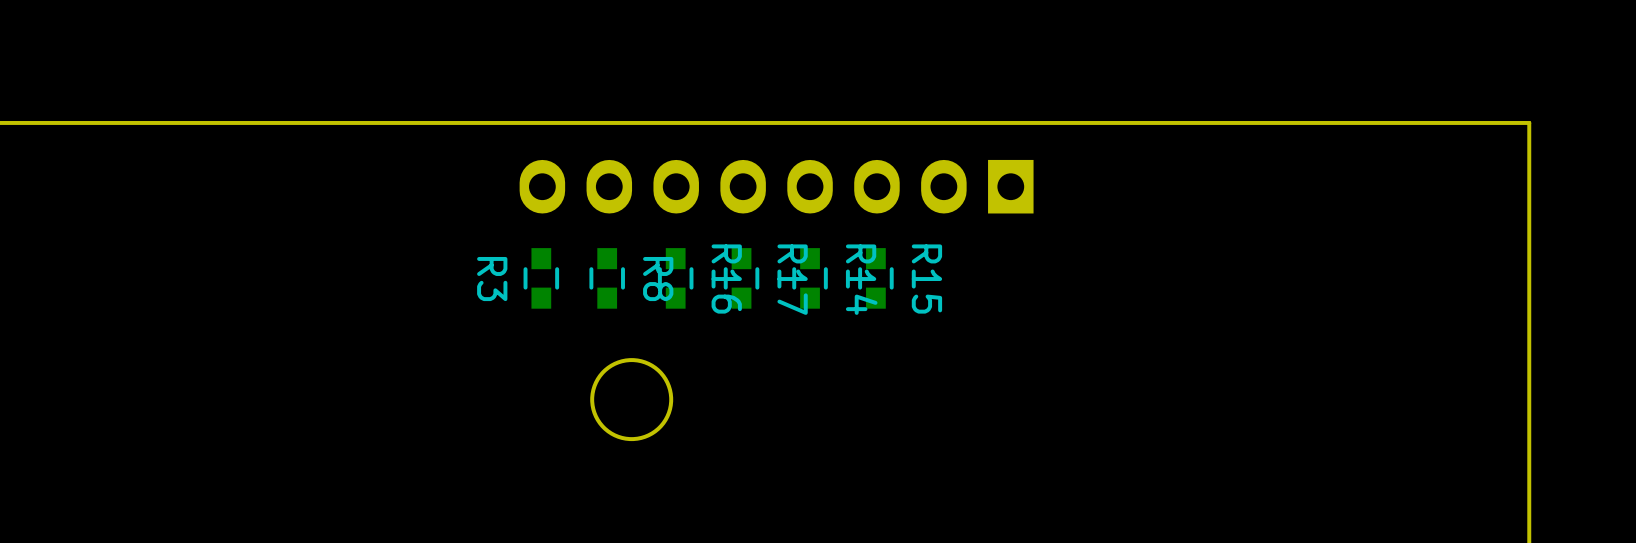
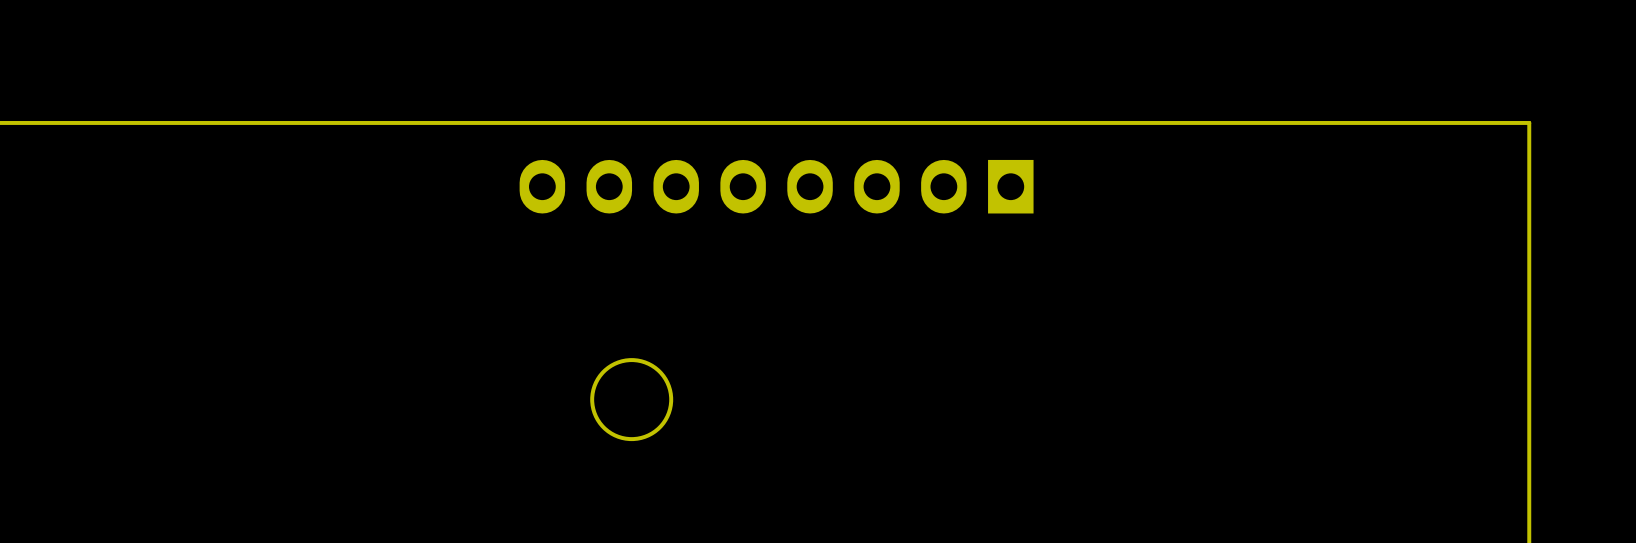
R3: (541, 278) -> none
R8: (607, 278) -> none
R16: (675, 278) -> none
R17: (741, 278) -> none
R14: (810, 278) -> none
R15: (875, 278) -> none

